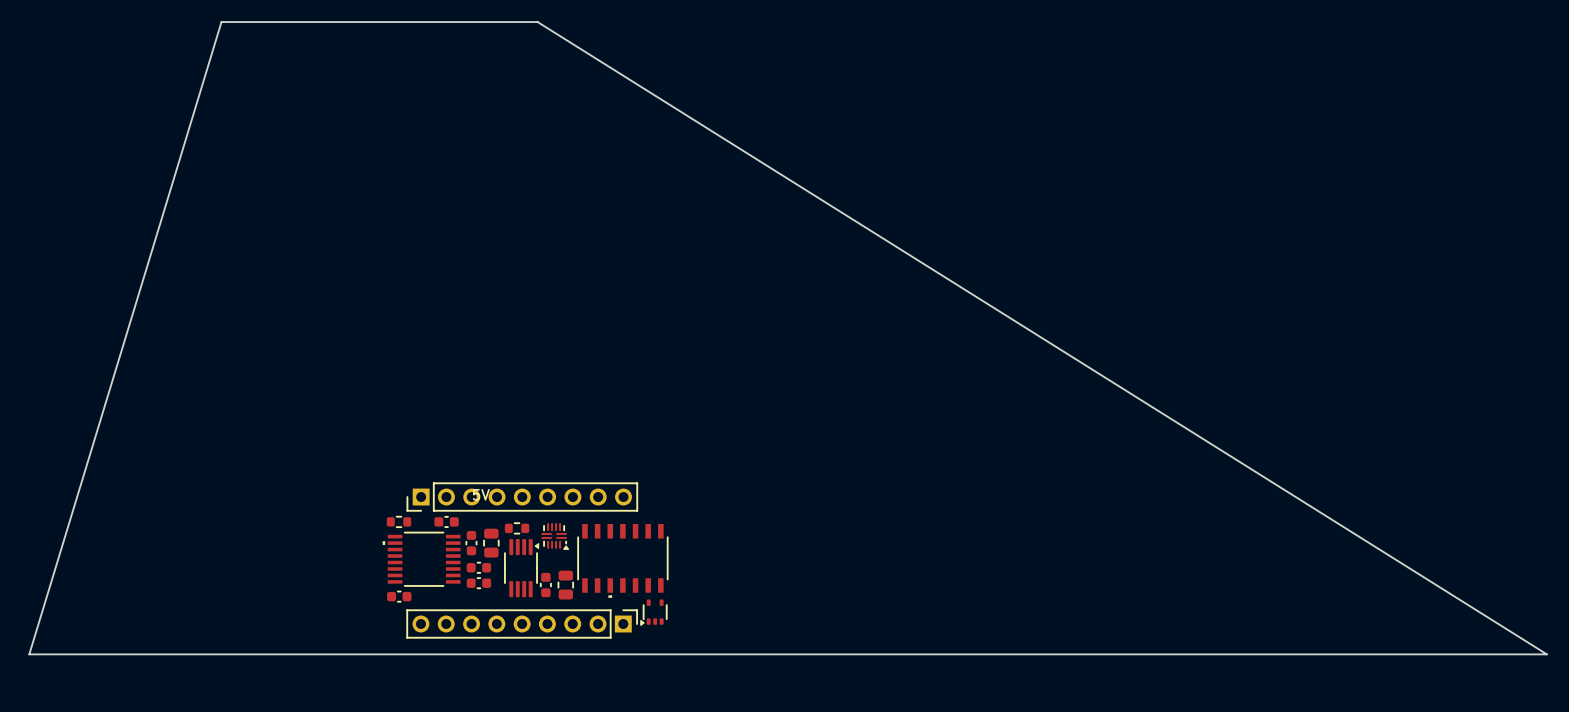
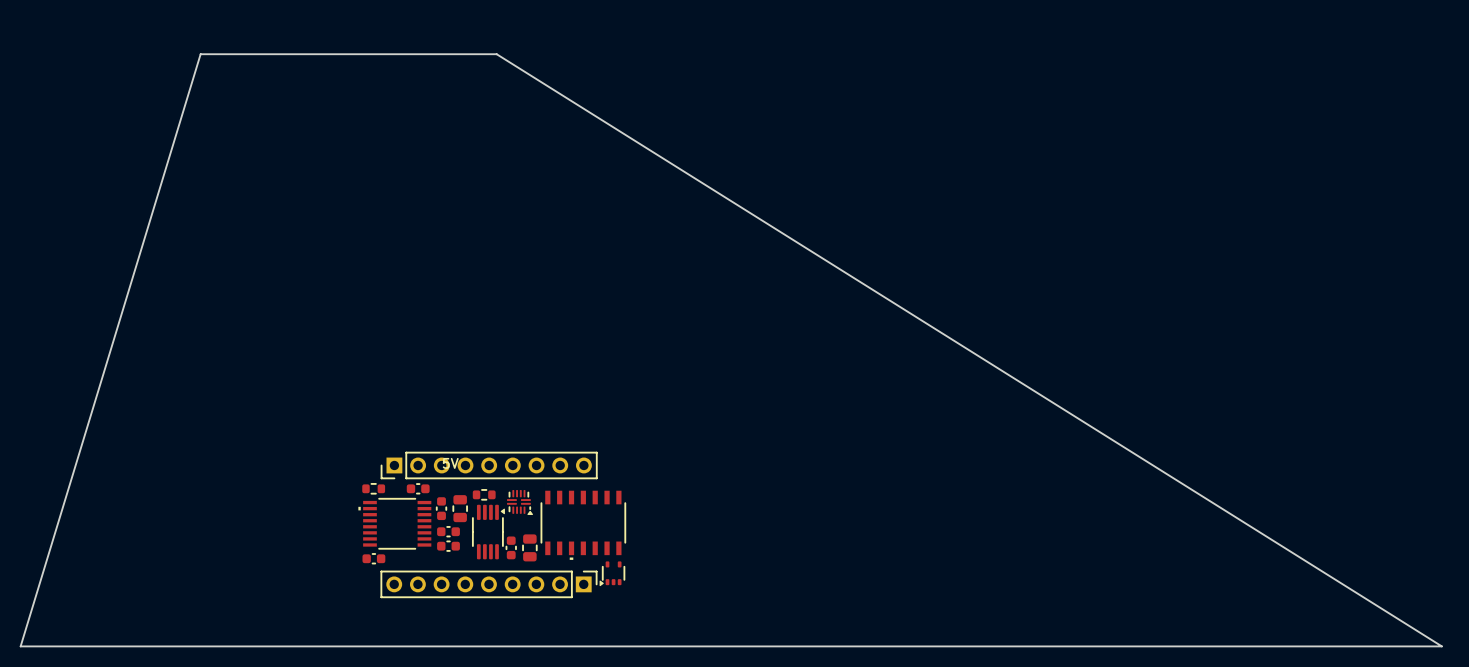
board edge: (221, 22) (29, 654) (1546, 654) (537, 22) (221, 22) -> (200, 54) (20, 646) (1441, 646) (496, 54) (200, 54)

